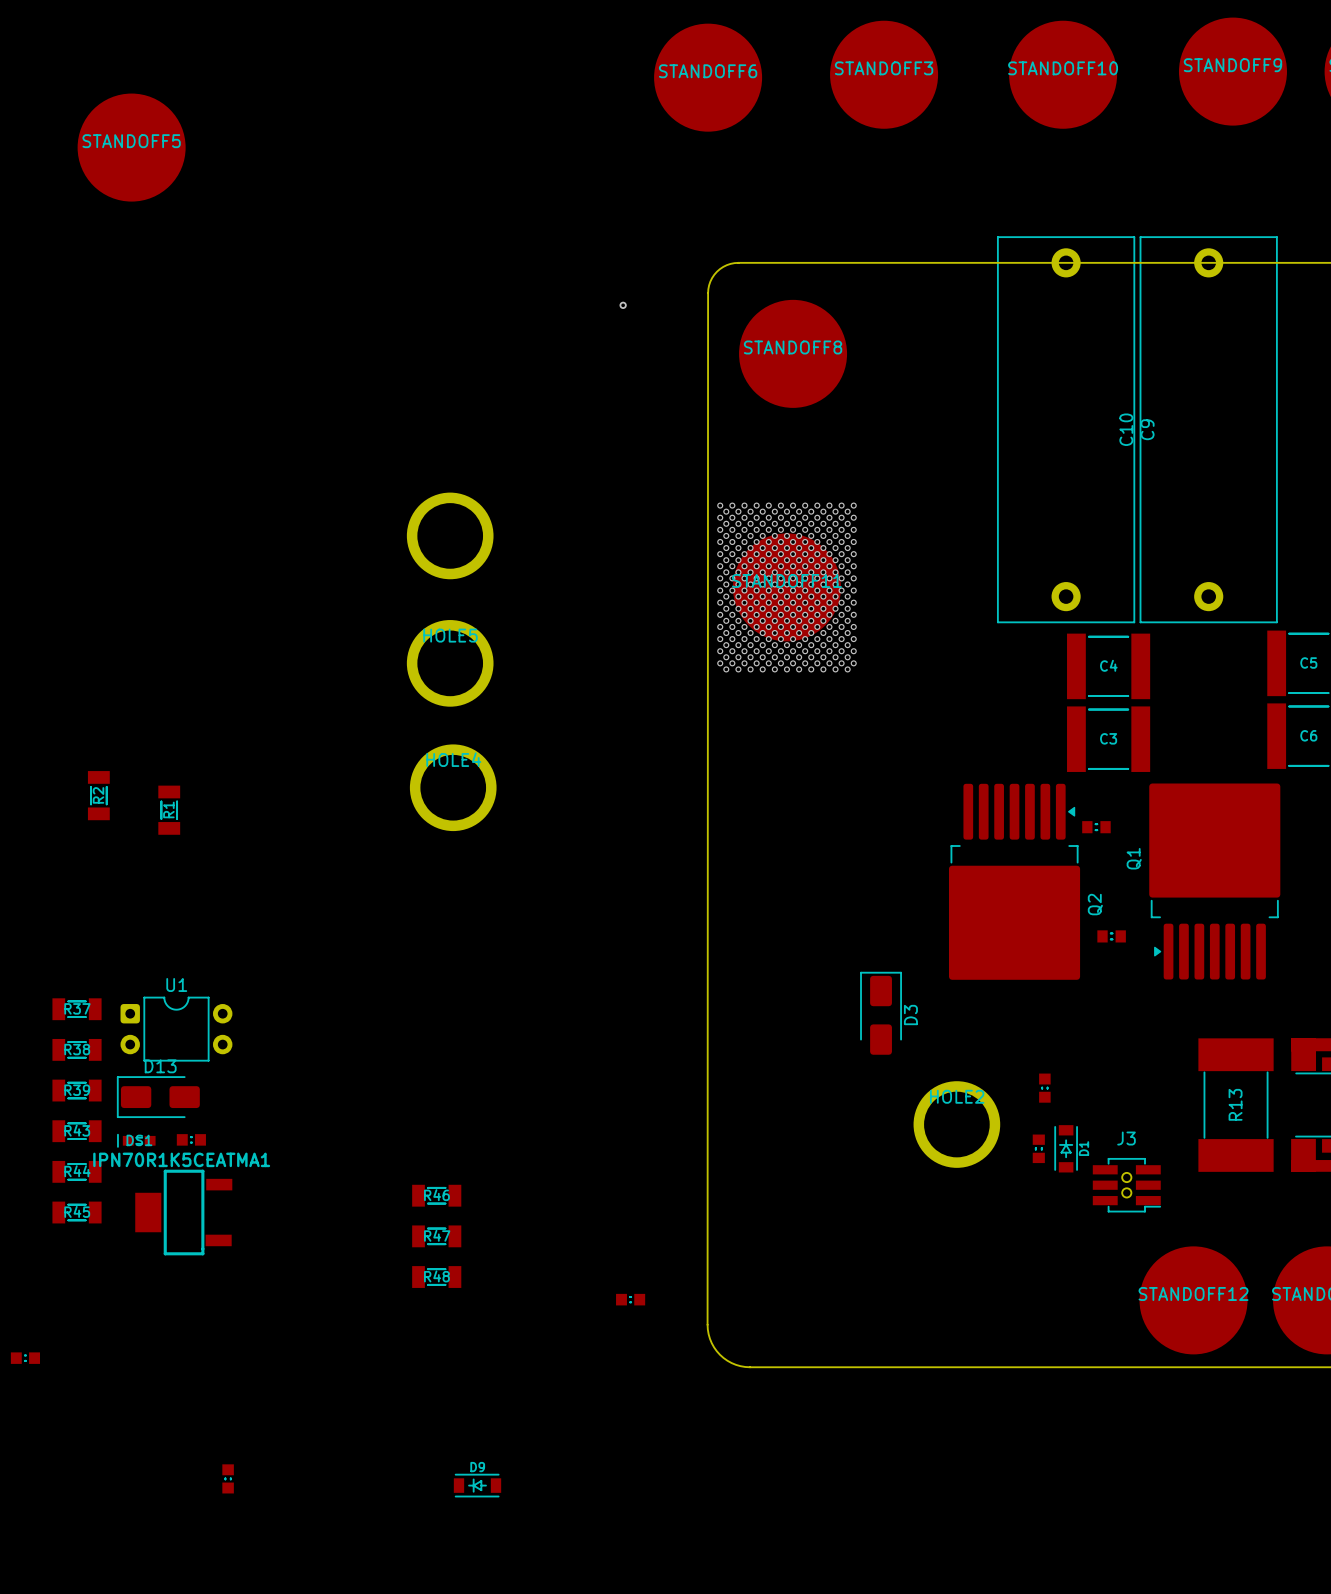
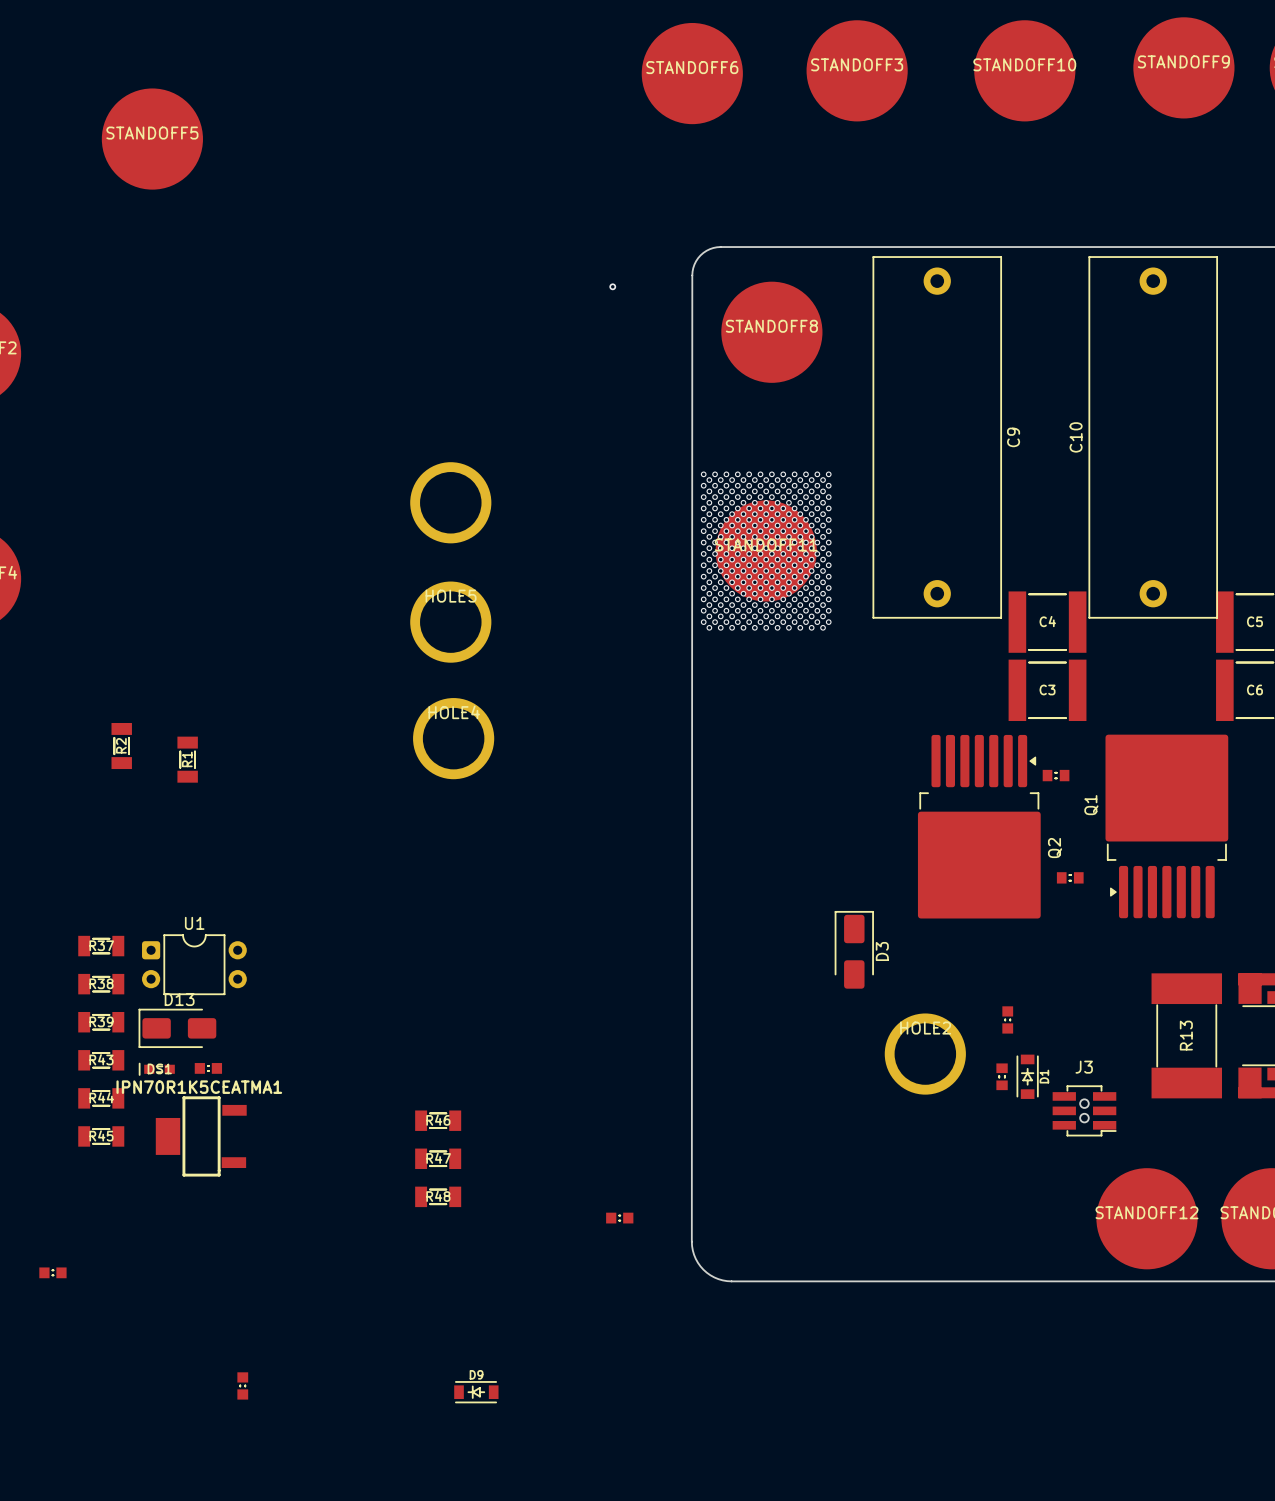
C9 position: (1066, 429) -> (937, 437)
C10 position: (1208, 429) -> (1153, 437)
C4 position: (1108, 666) -> (1047, 622)
C3 position: (1108, 739) -> (1047, 690)

